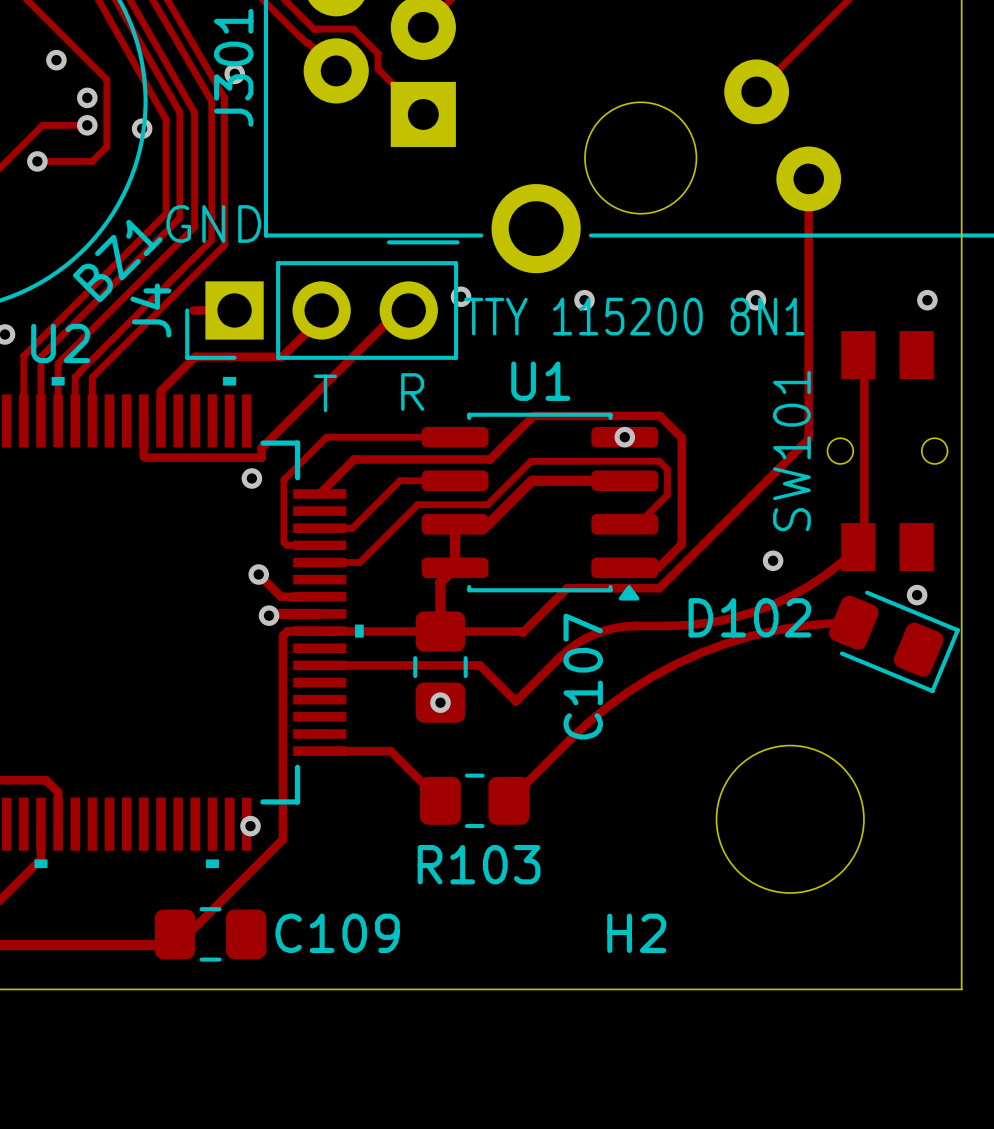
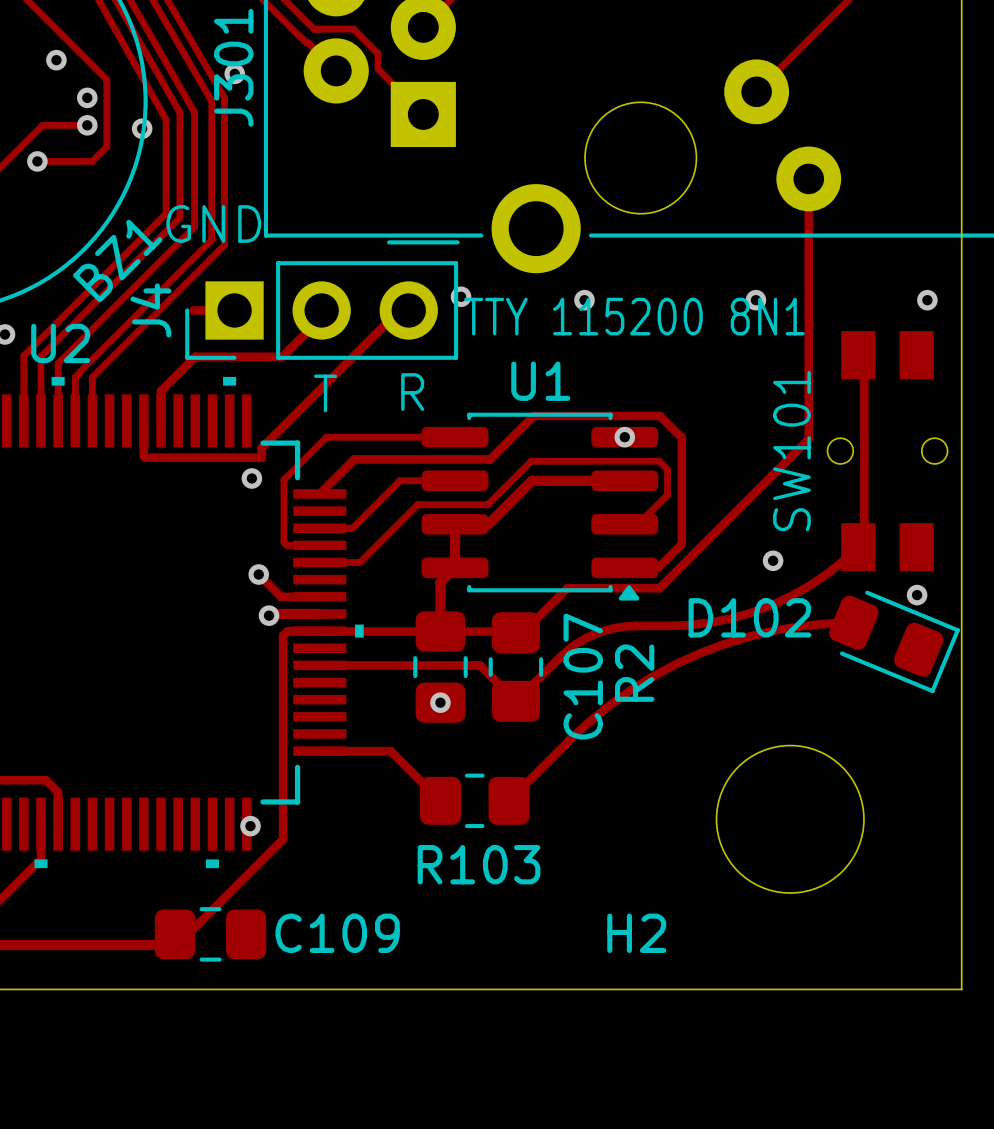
R2: none -> (515, 667)

